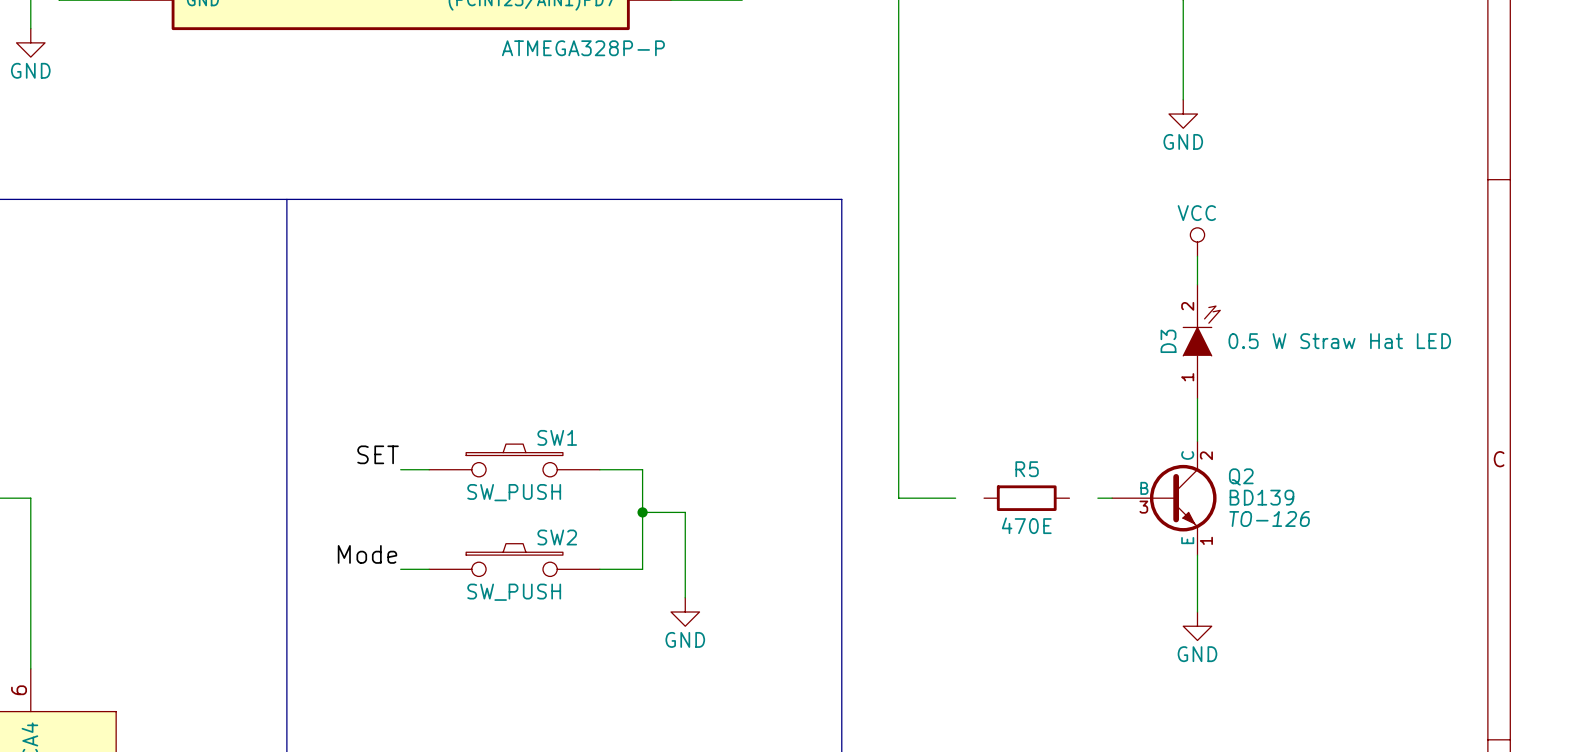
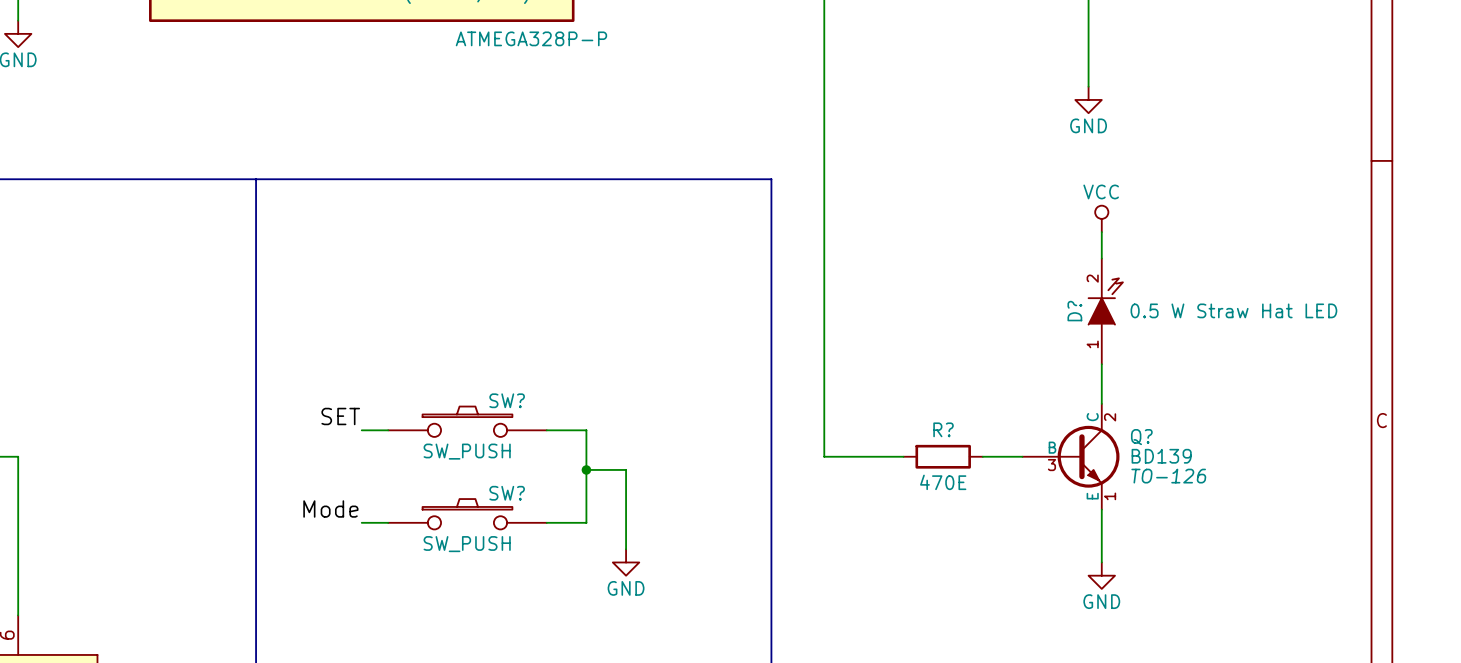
D3 name: D3 (1168, 341) -> D? (1074, 311)
SW1 name: SW1 (557, 437) -> SW? (507, 400)
R5 name: R5 (1027, 469) -> R? (943, 429)
Q2 name: Q2 (1241, 476) -> Q? (1141, 437)
wire: none -> (877, 456) (903, 456)
wire: none -> (982, 456) (1009, 456)
SW2 name: SW2 (557, 537) -> SW? (507, 493)

